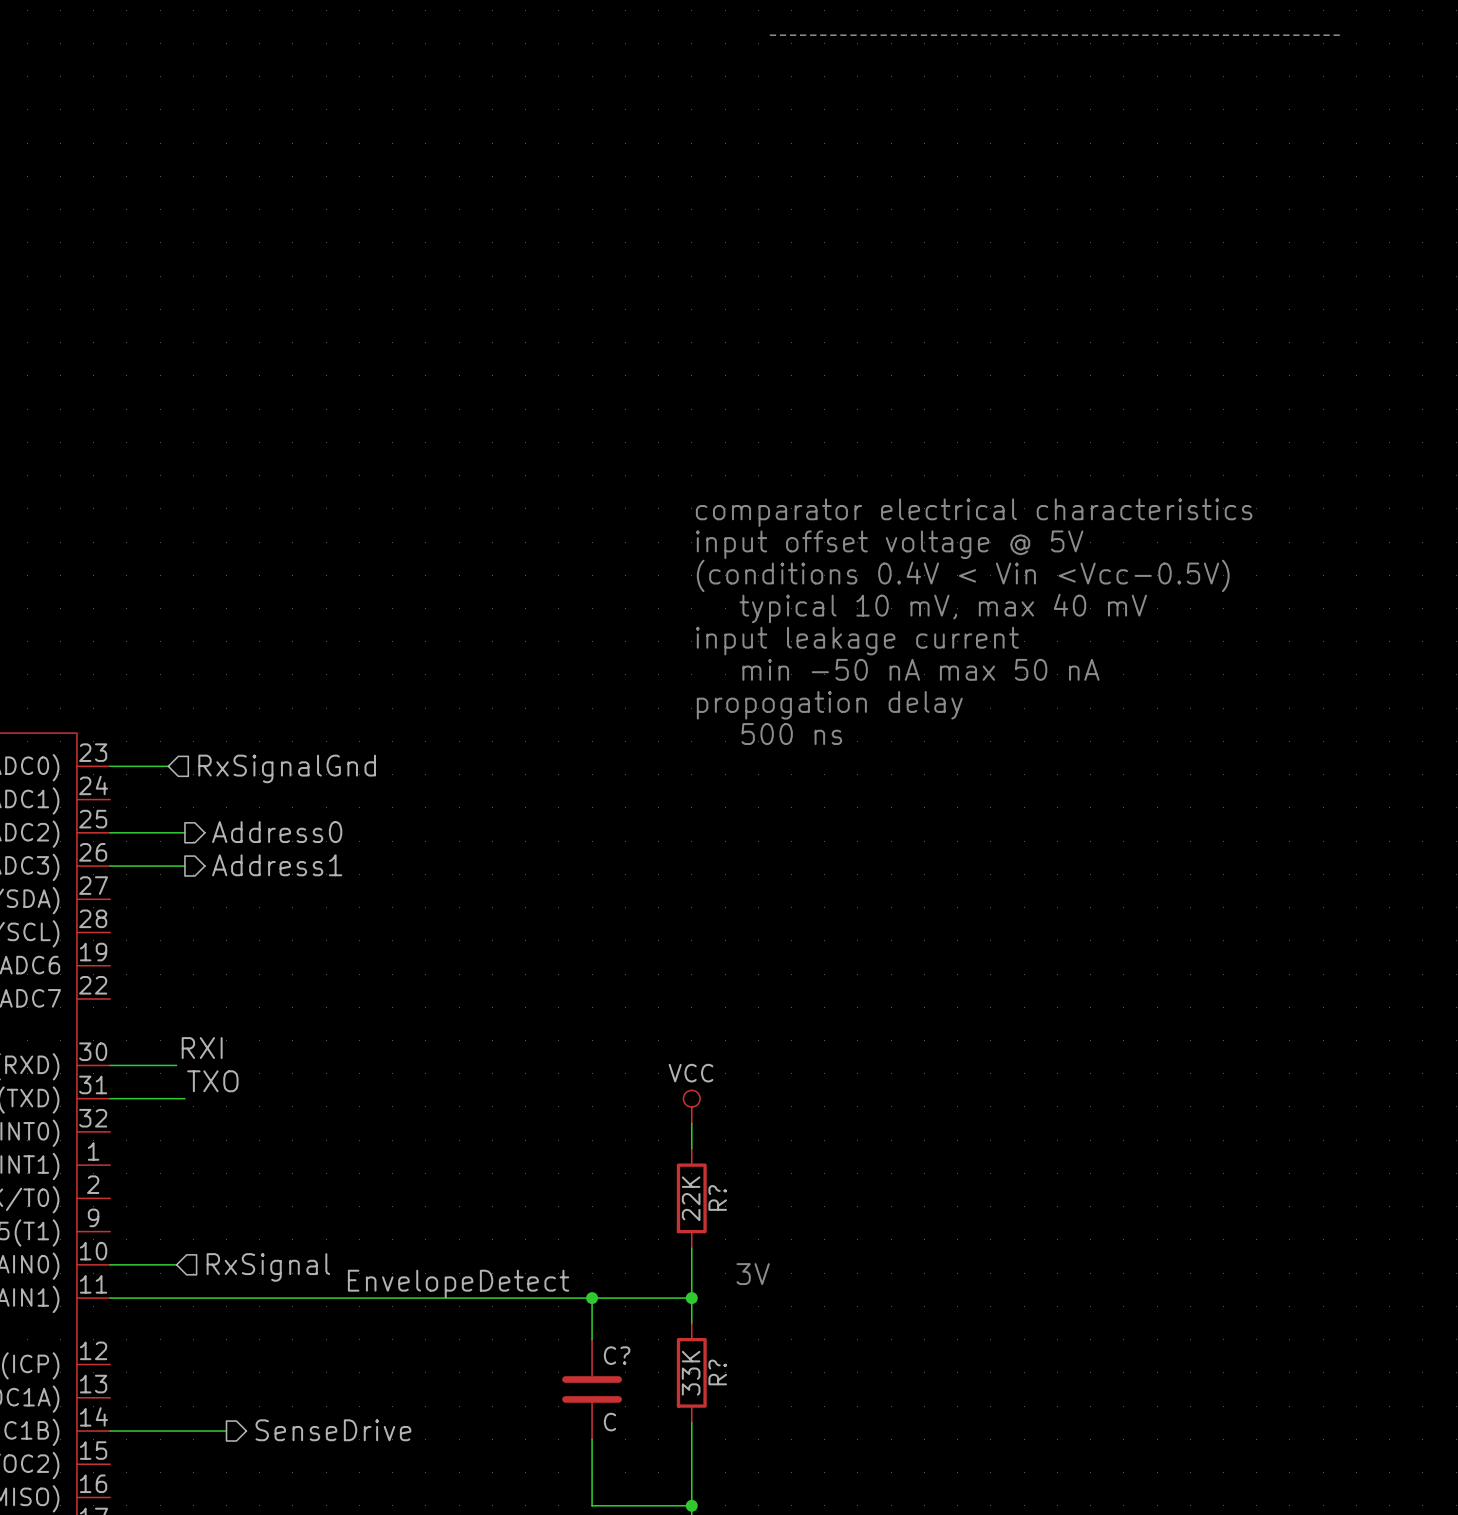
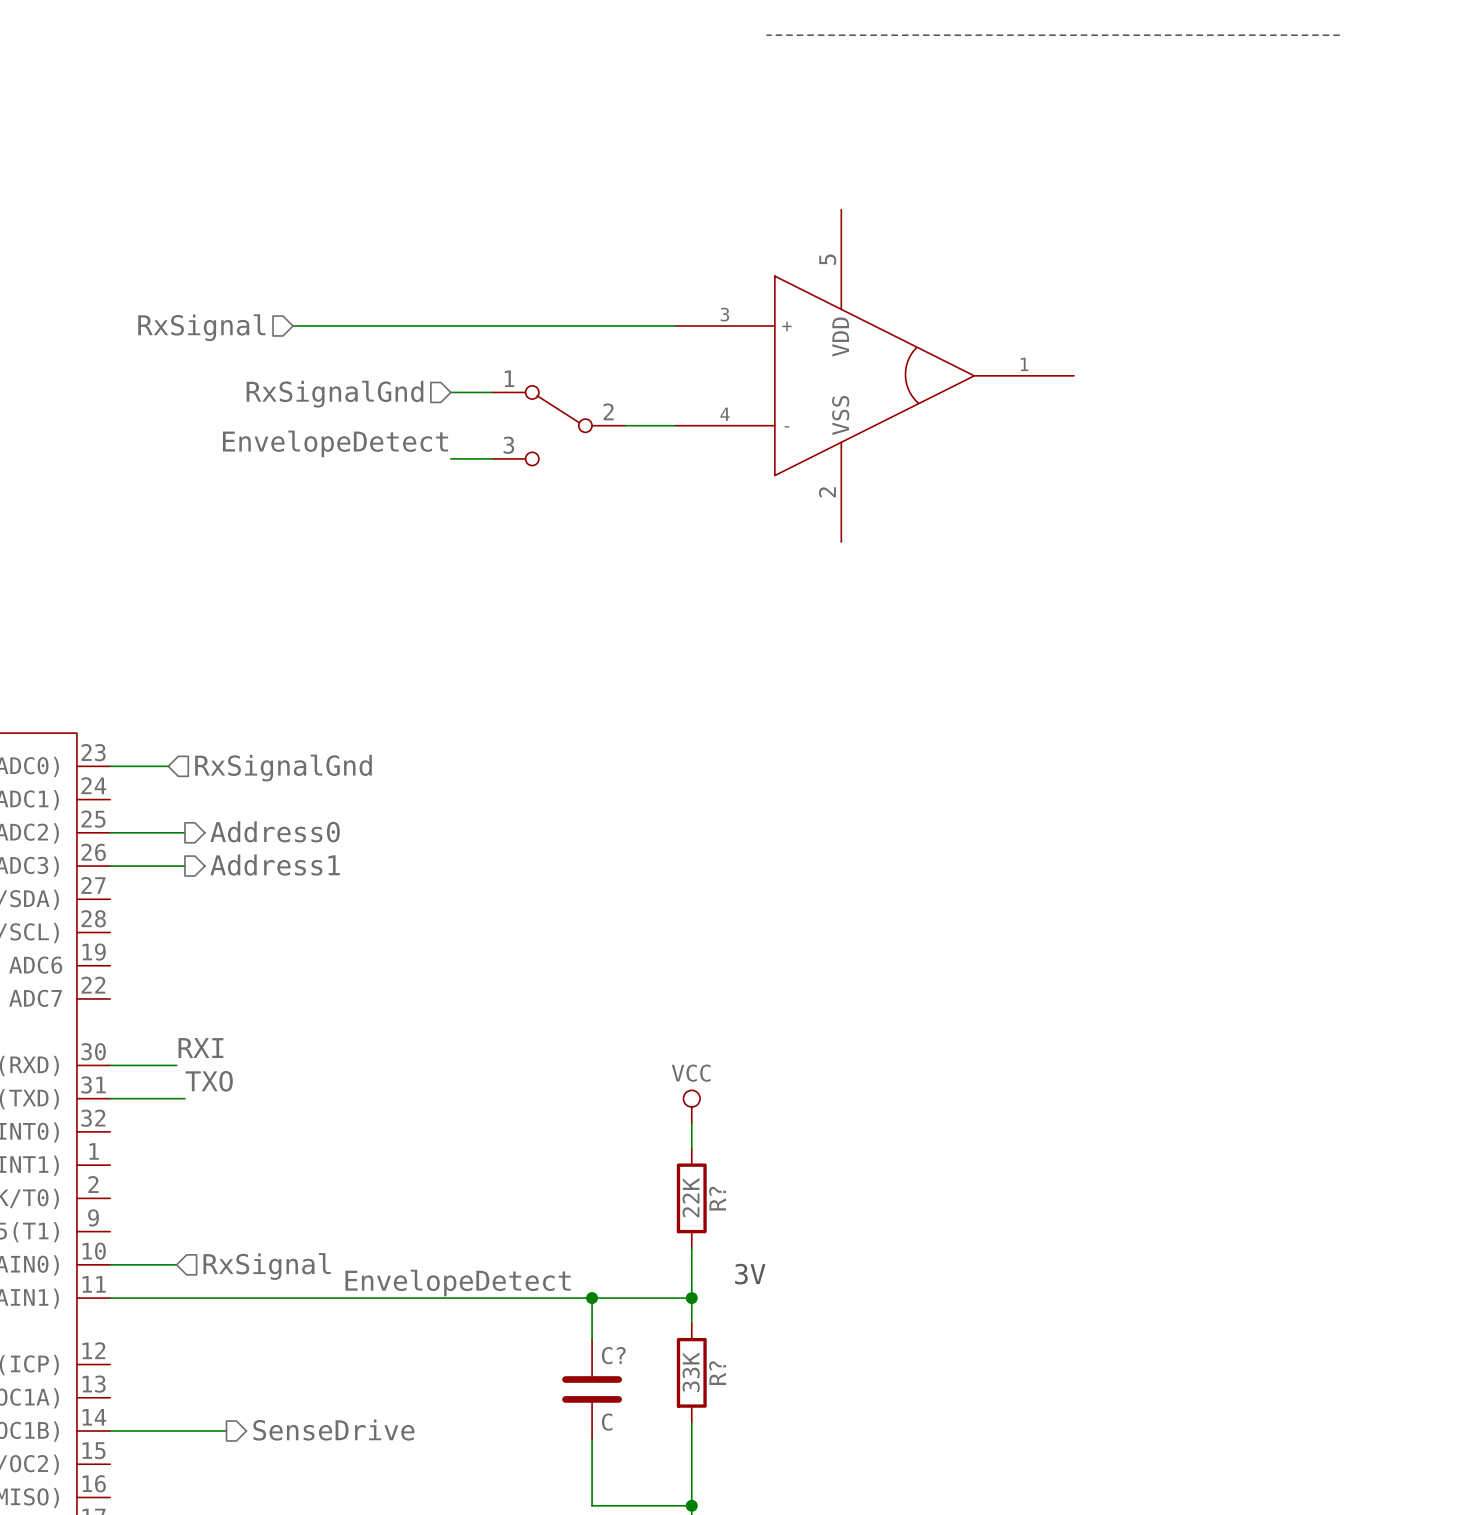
wire: none -> (292, 326) (675, 326)
hierarchical label: none -> RxSignal (201, 327)
part: none -> (874, 375)
wire: none -> (450, 392) (492, 392)
hierarchical label: none -> RxSignalGnd (335, 394)
part: none -> (558, 425)
wire: none -> (625, 425) (675, 425)
label: none -> EnvelopeDetect (335, 443)
wire: none -> (450, 458) (492, 458)
text: comparator electrical characteristics (974, 512) -> none
text: input offset voltage @ 5V (889, 544) -> none
text: (conditions 0.4V < Vin <Vcc-0.5V) (963, 575) -> none
text: typical 10 mV, max 40 mV (943, 608) -> none
text: input leakage current (857, 641) -> none
text: min -50 nA max 50 nA (920, 669) -> none
text: propogation delay (829, 705) -> none
text: 500 ns (791, 734) -> none

